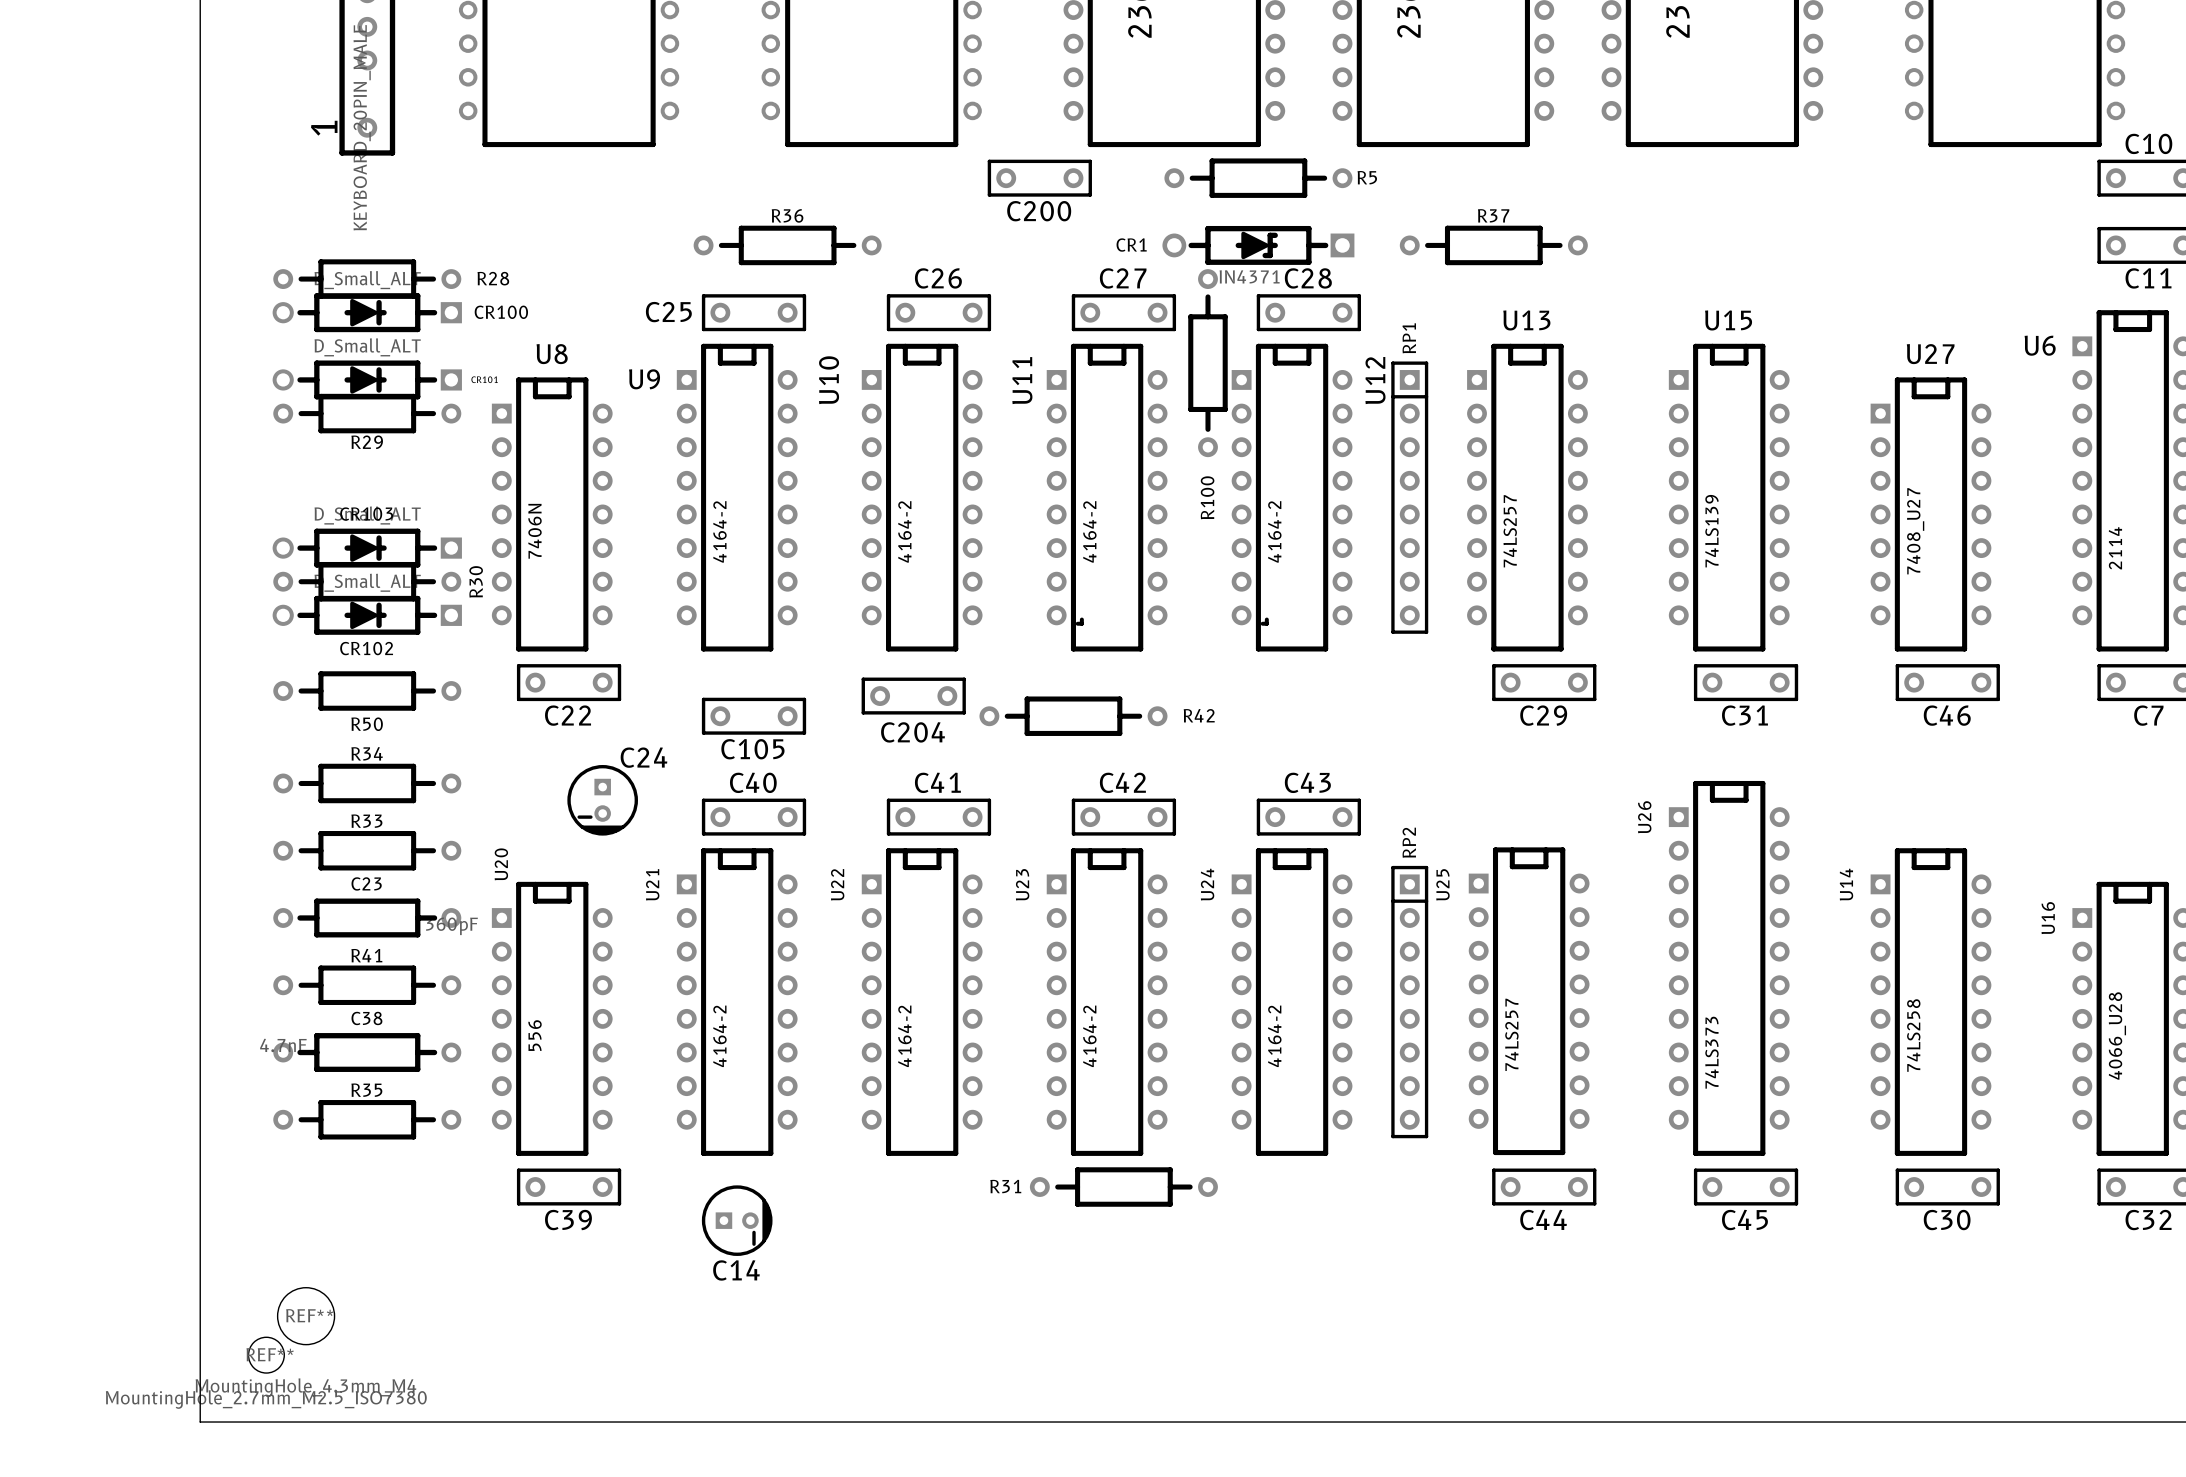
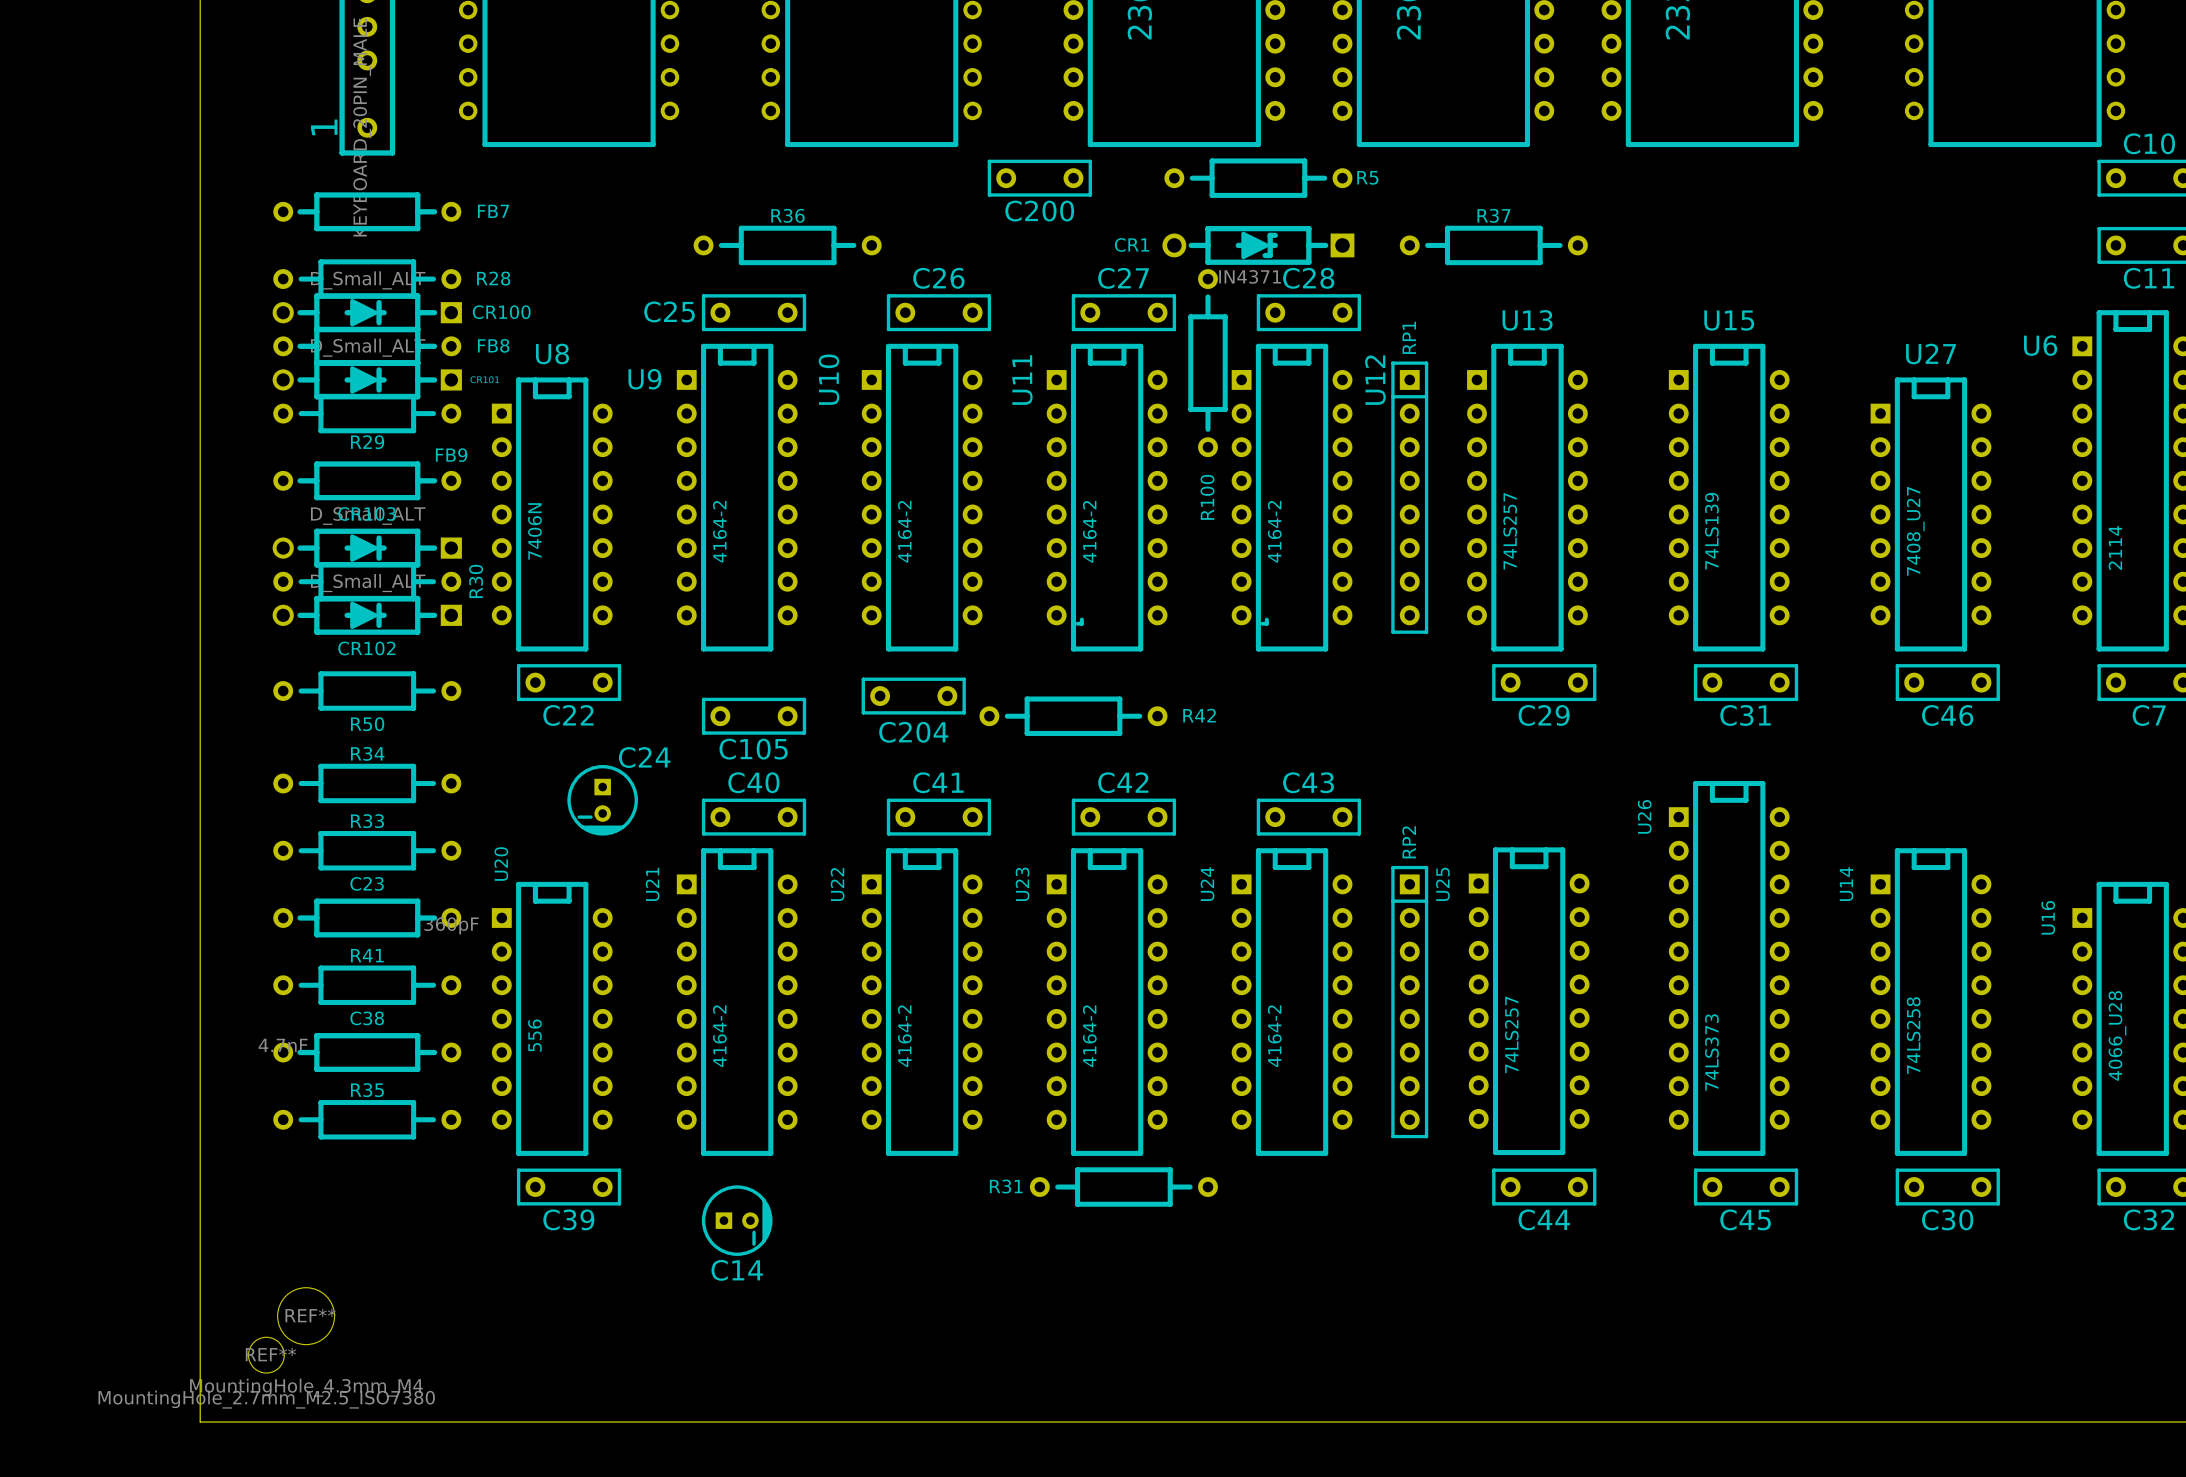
FB7: none -> (367, 211)
FB8: none -> (367, 346)
FB9: none -> (367, 480)

